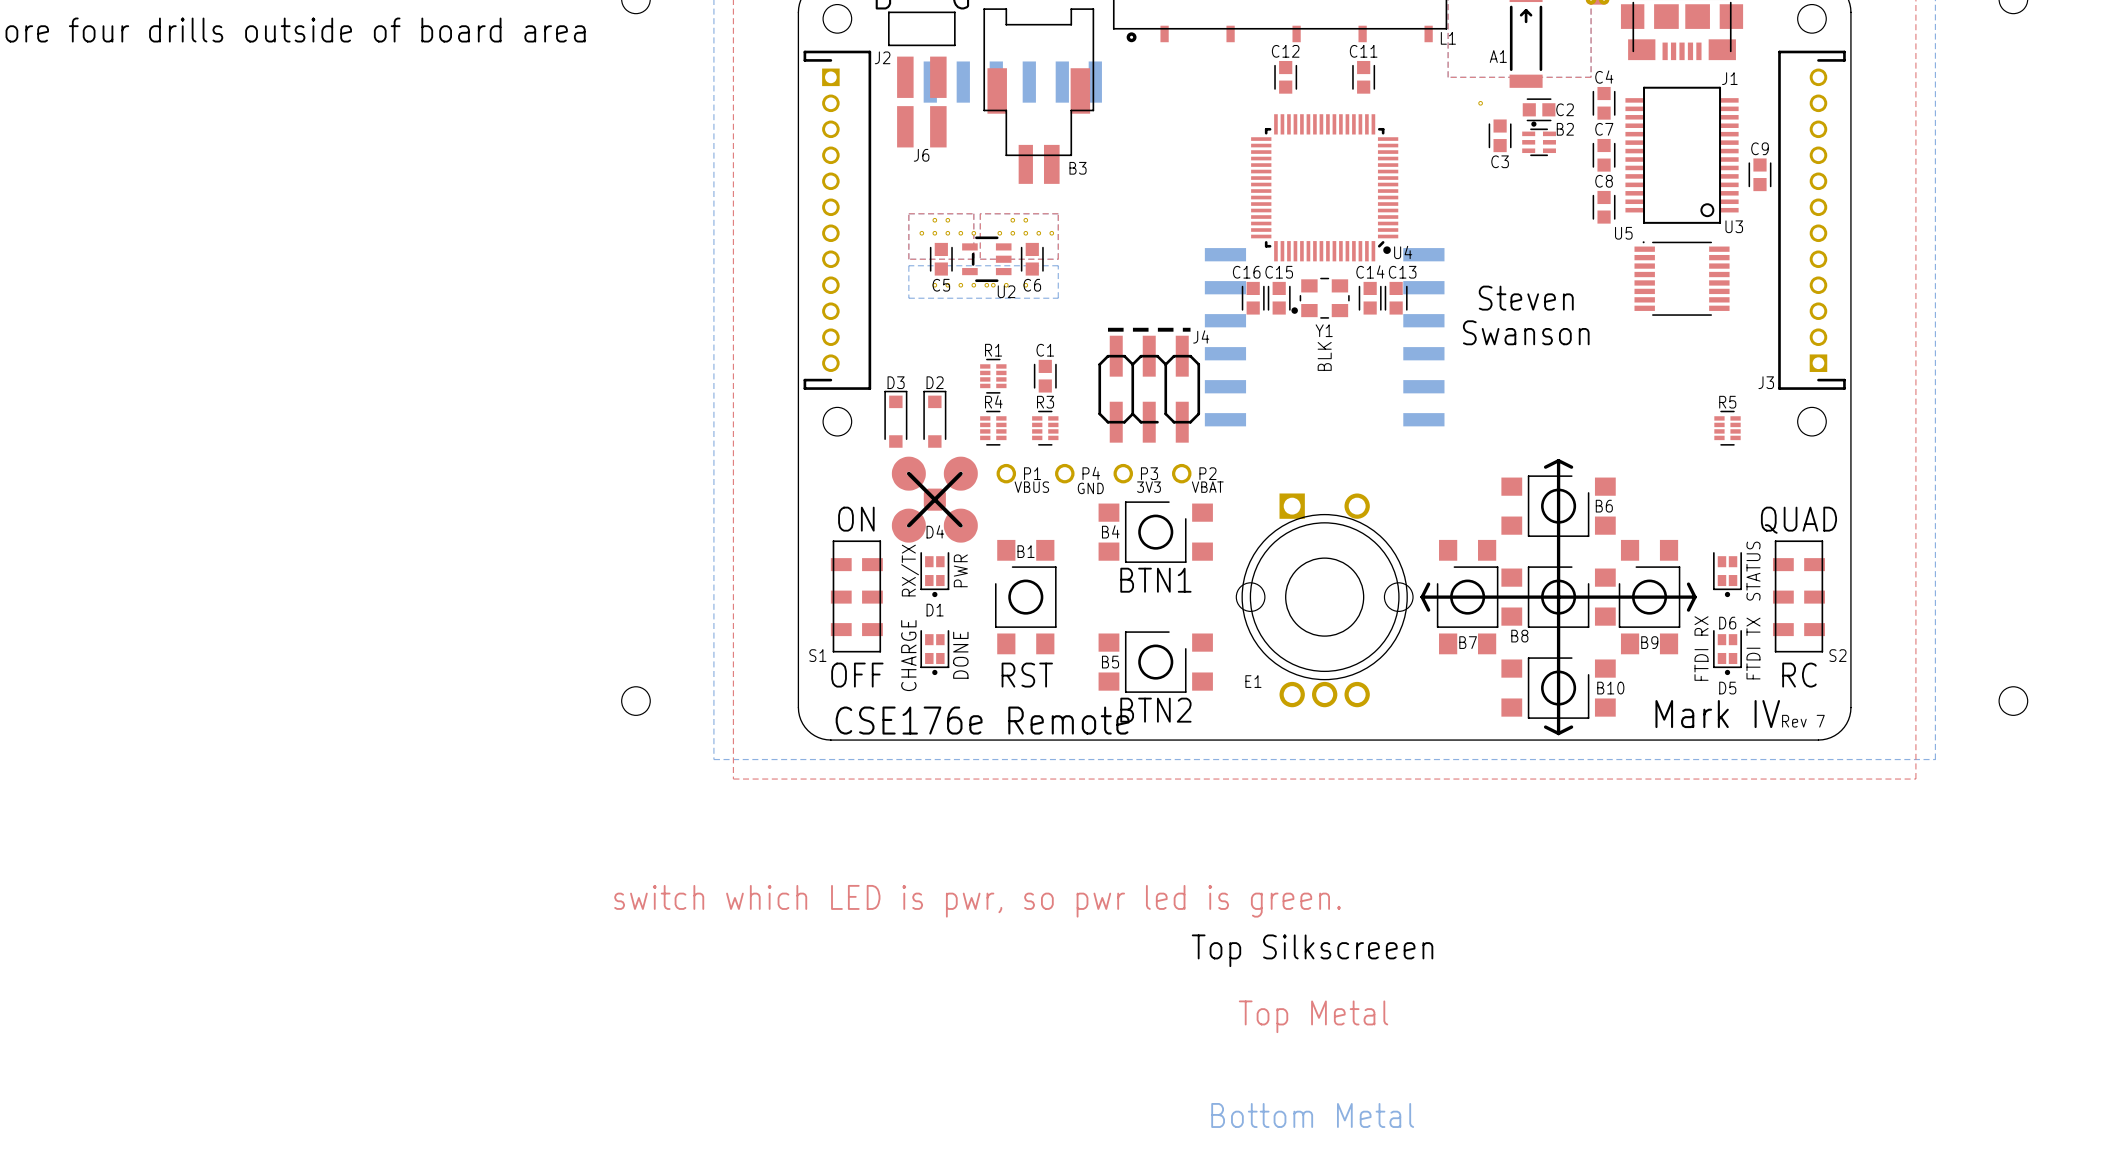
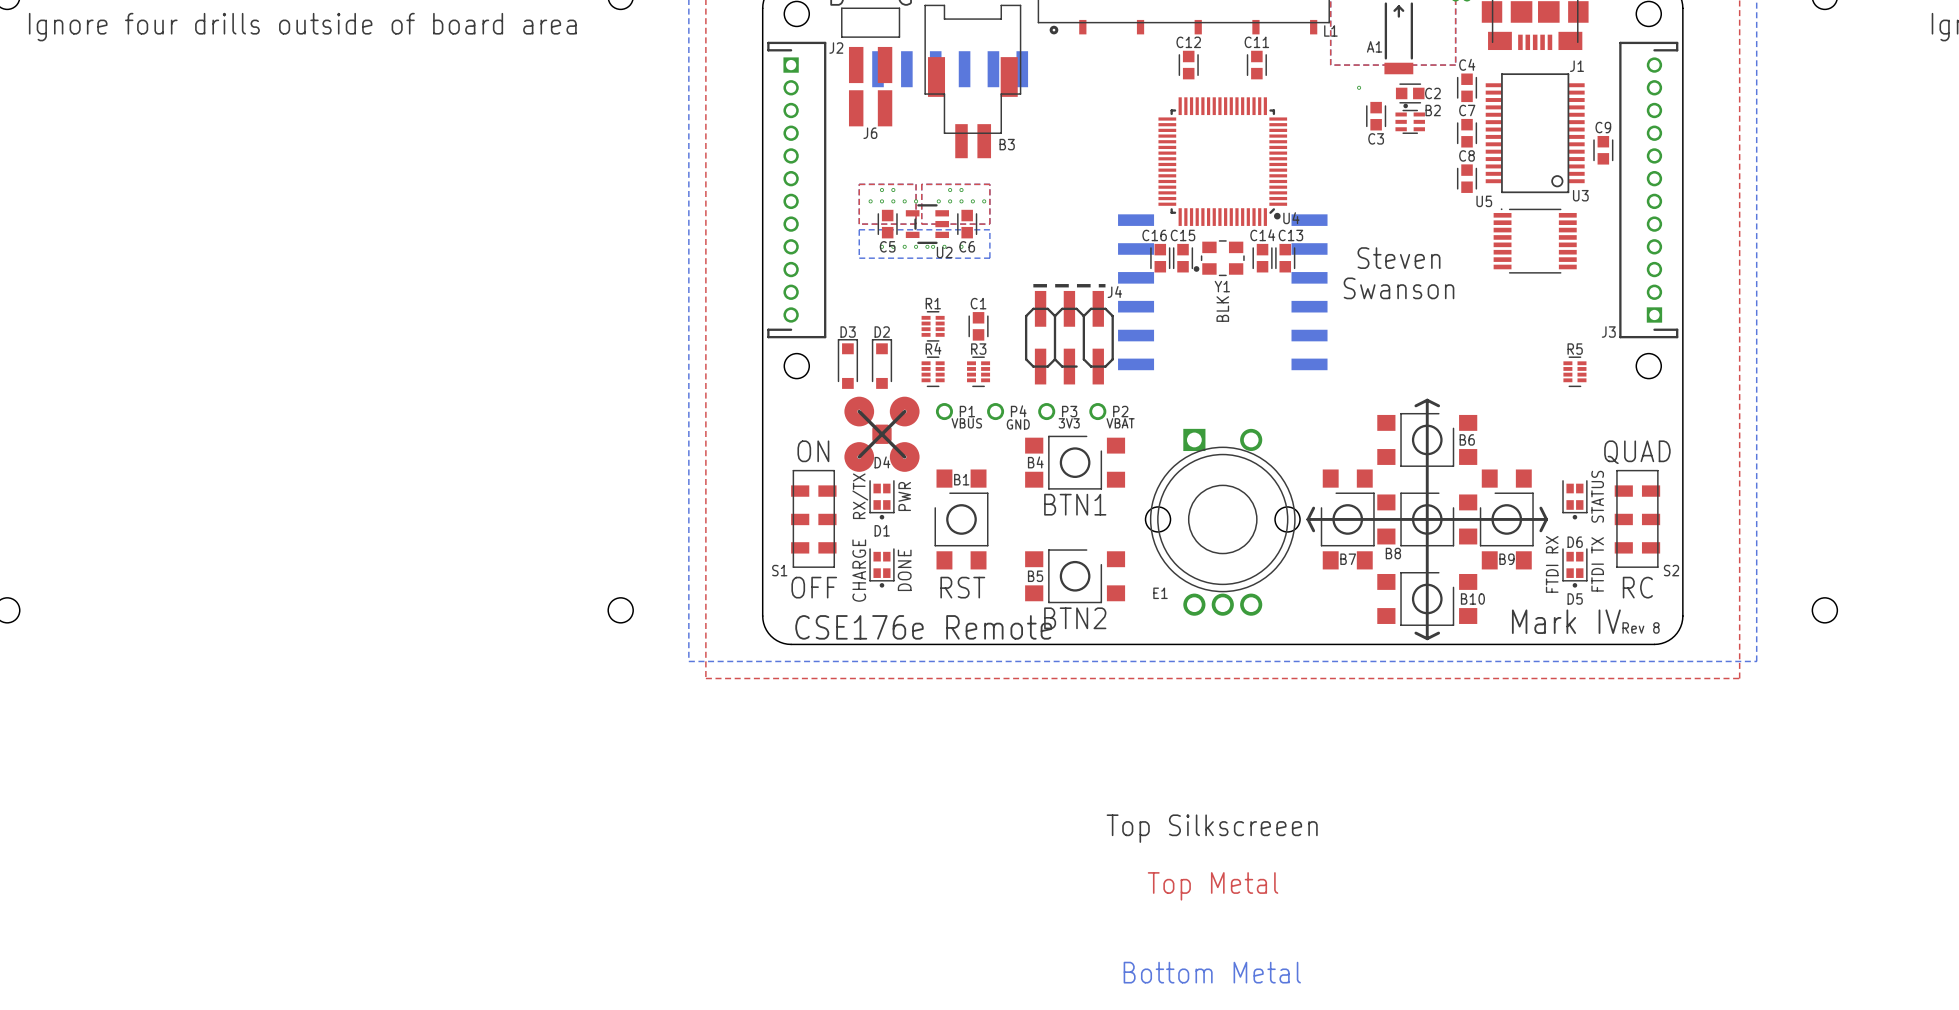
text: Rev 7 (1803, 721) -> Rev 8 (1641, 627)
text: switch which LED is pwr, so pwr led is green. (977, 901) -> none

